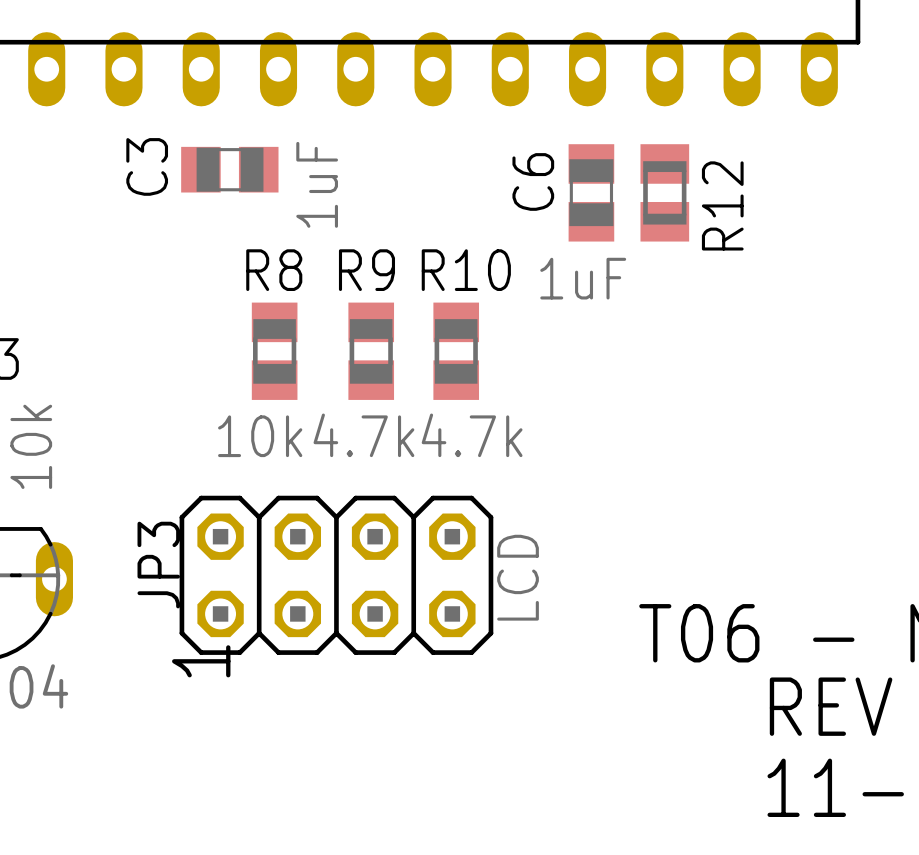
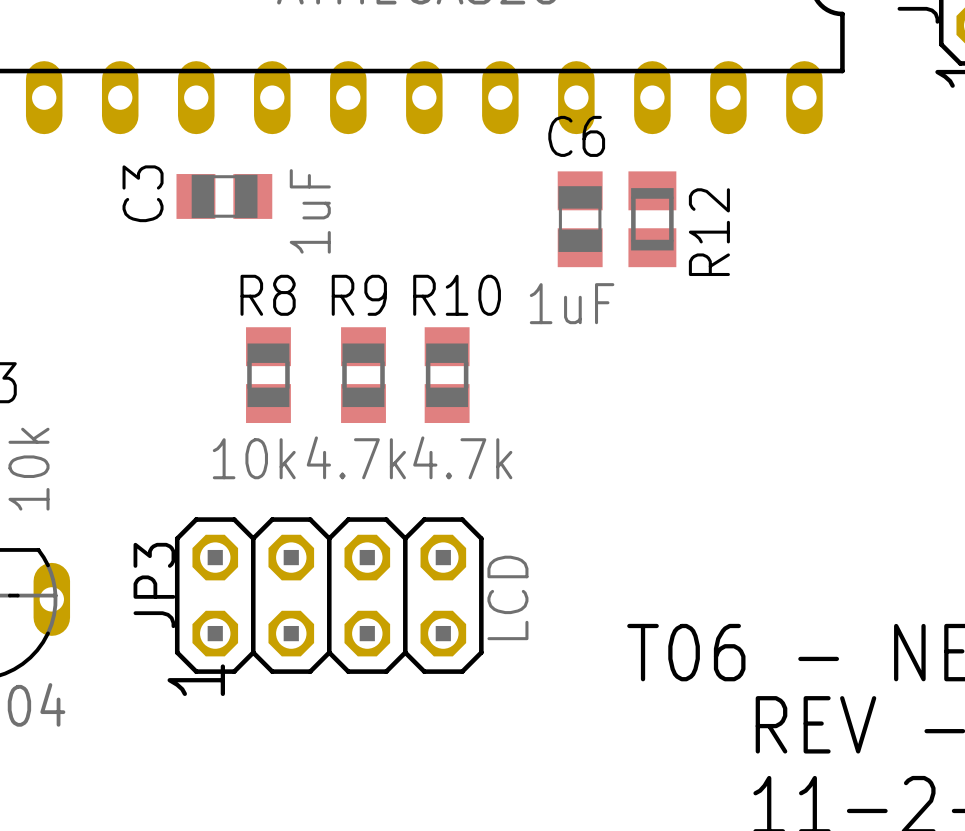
C6 name rotation: 0° (533, 181) -> 90° clockwise (576, 136)
C6 name position: C6 (533, 181) -> C6 (576, 136)

